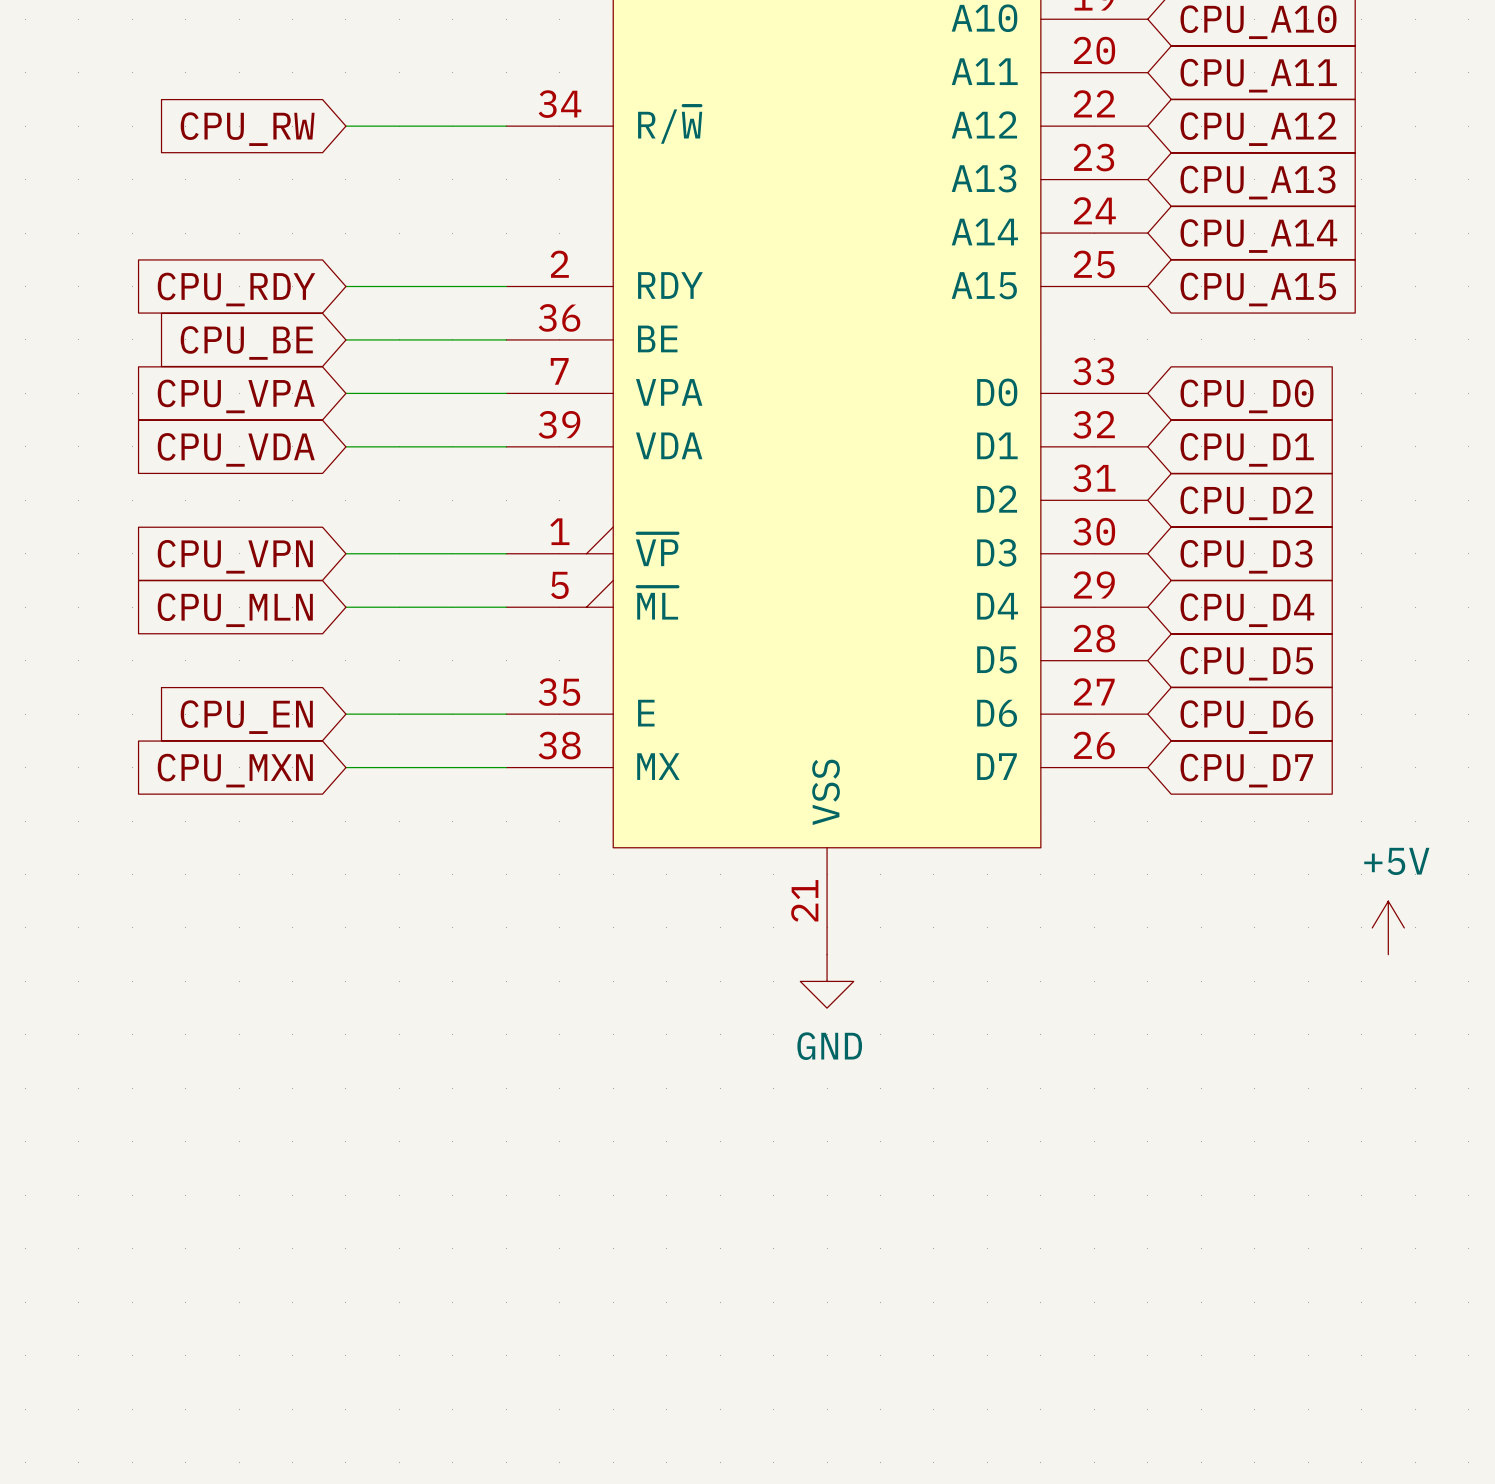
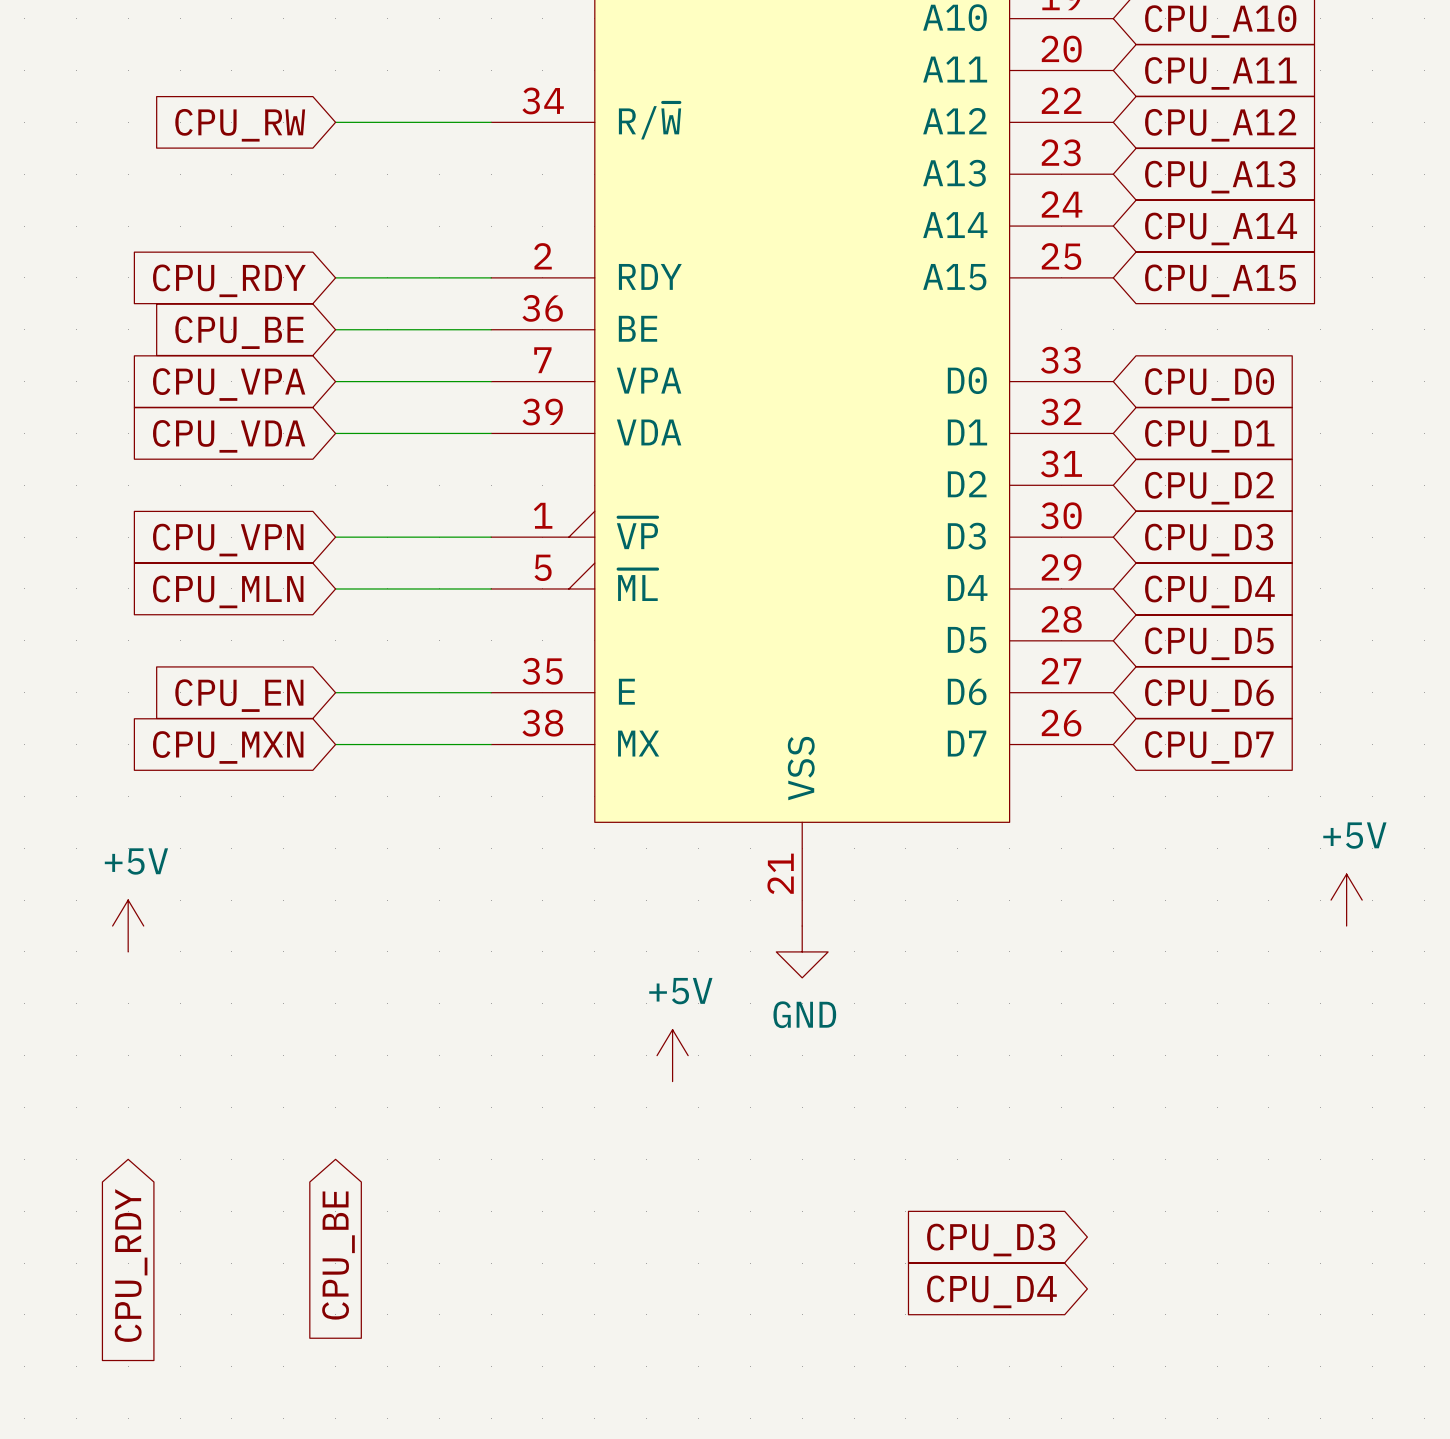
power symbol: none -> +5V (128, 926)
power symbol: none -> +5V (672, 1055)
global label: none -> CPU_D3 (991, 1240)
global label: none -> CPU_BE (338, 1255)
global label: none -> CPU_RDY (131, 1265)
global label: none -> CPU_D4 (991, 1291)

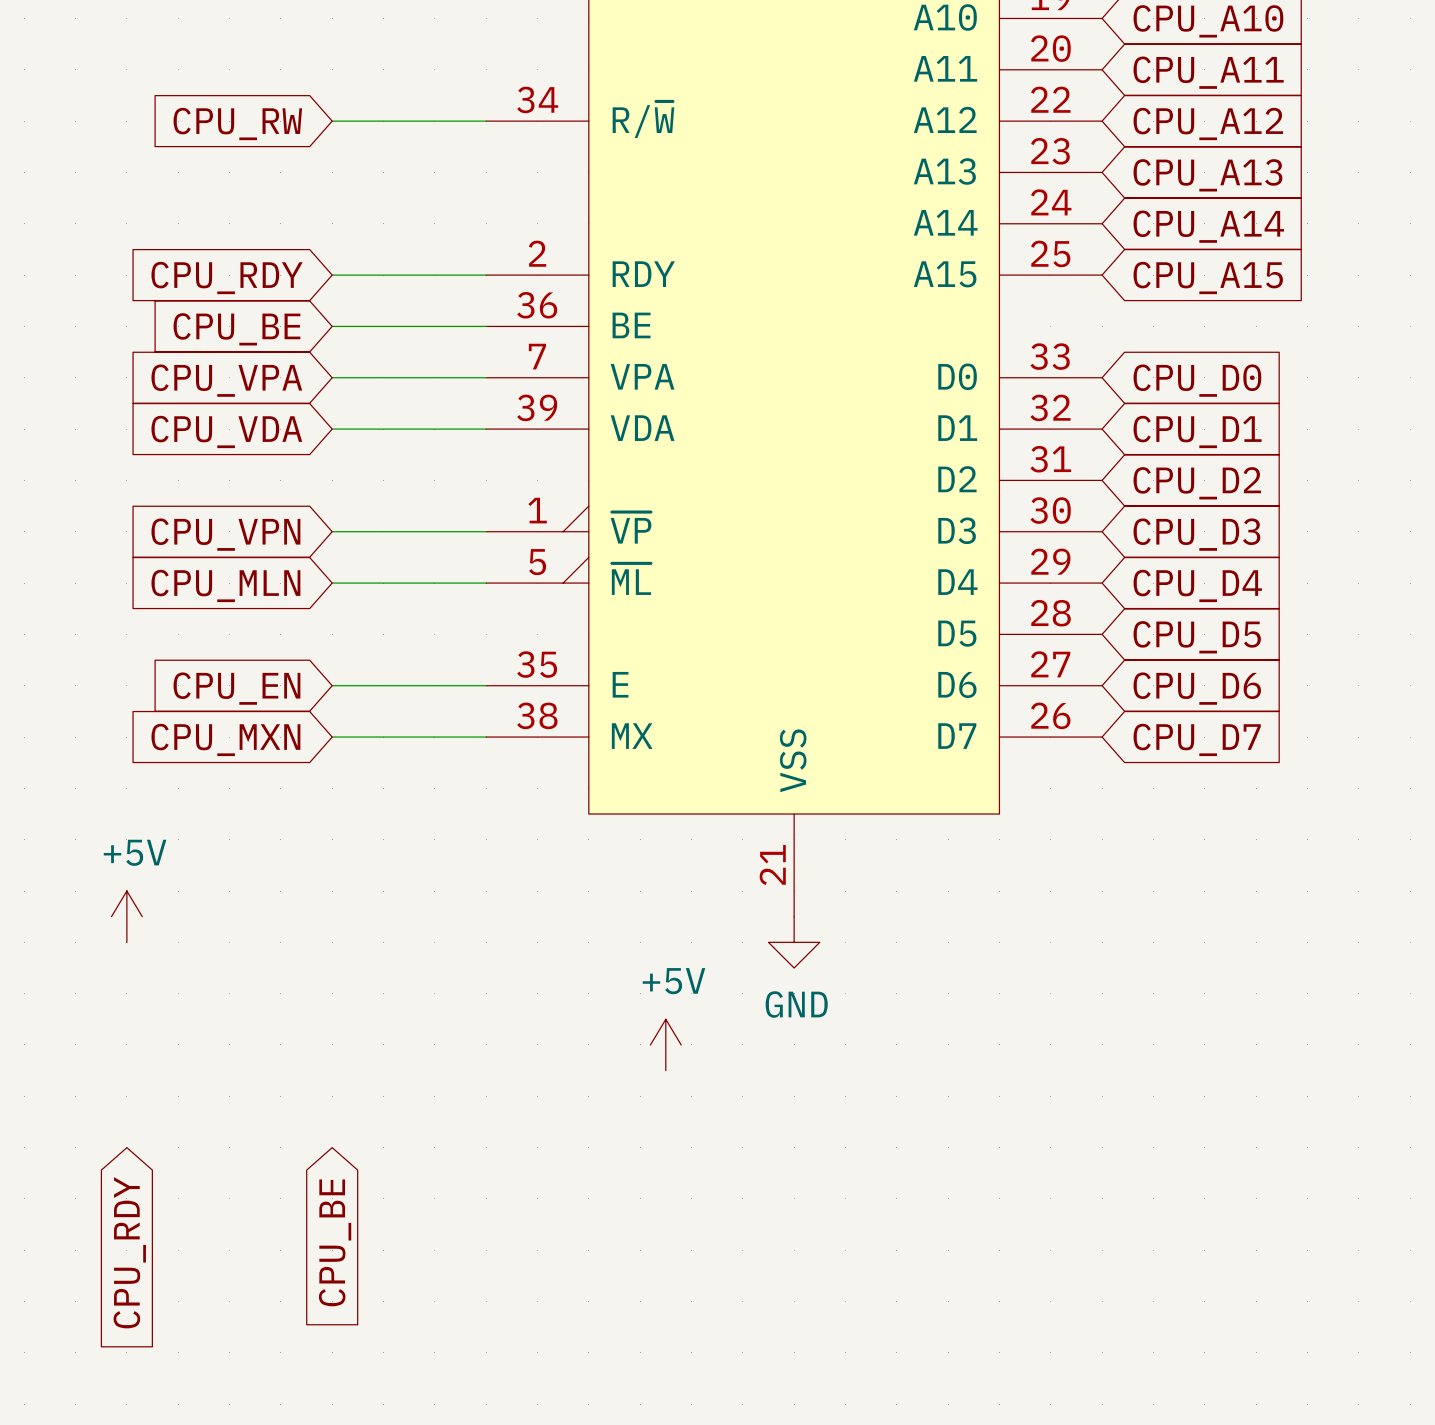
power symbol: +5V (1346, 900) -> none
global label: CPU_D3 (991, 1240) -> none
global label: CPU_D4 (991, 1291) -> none

